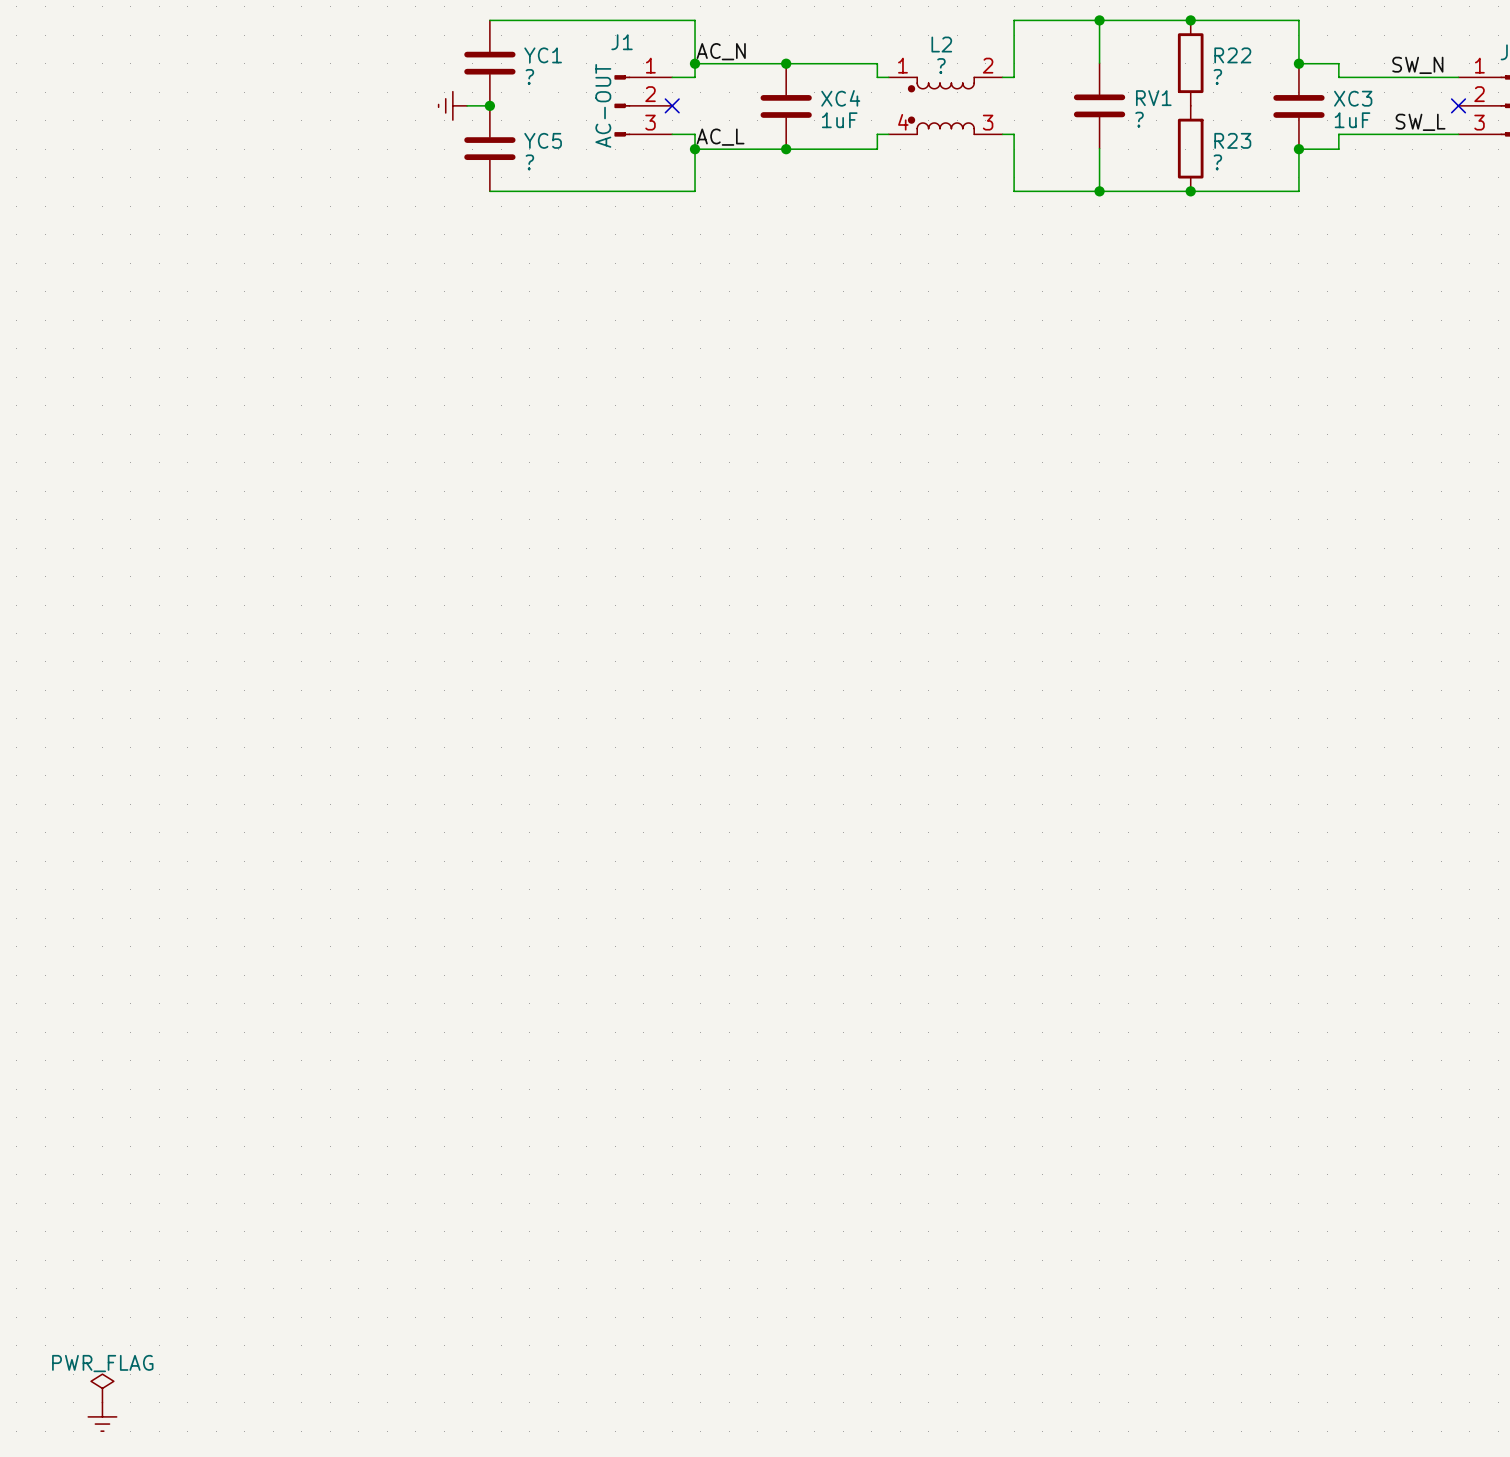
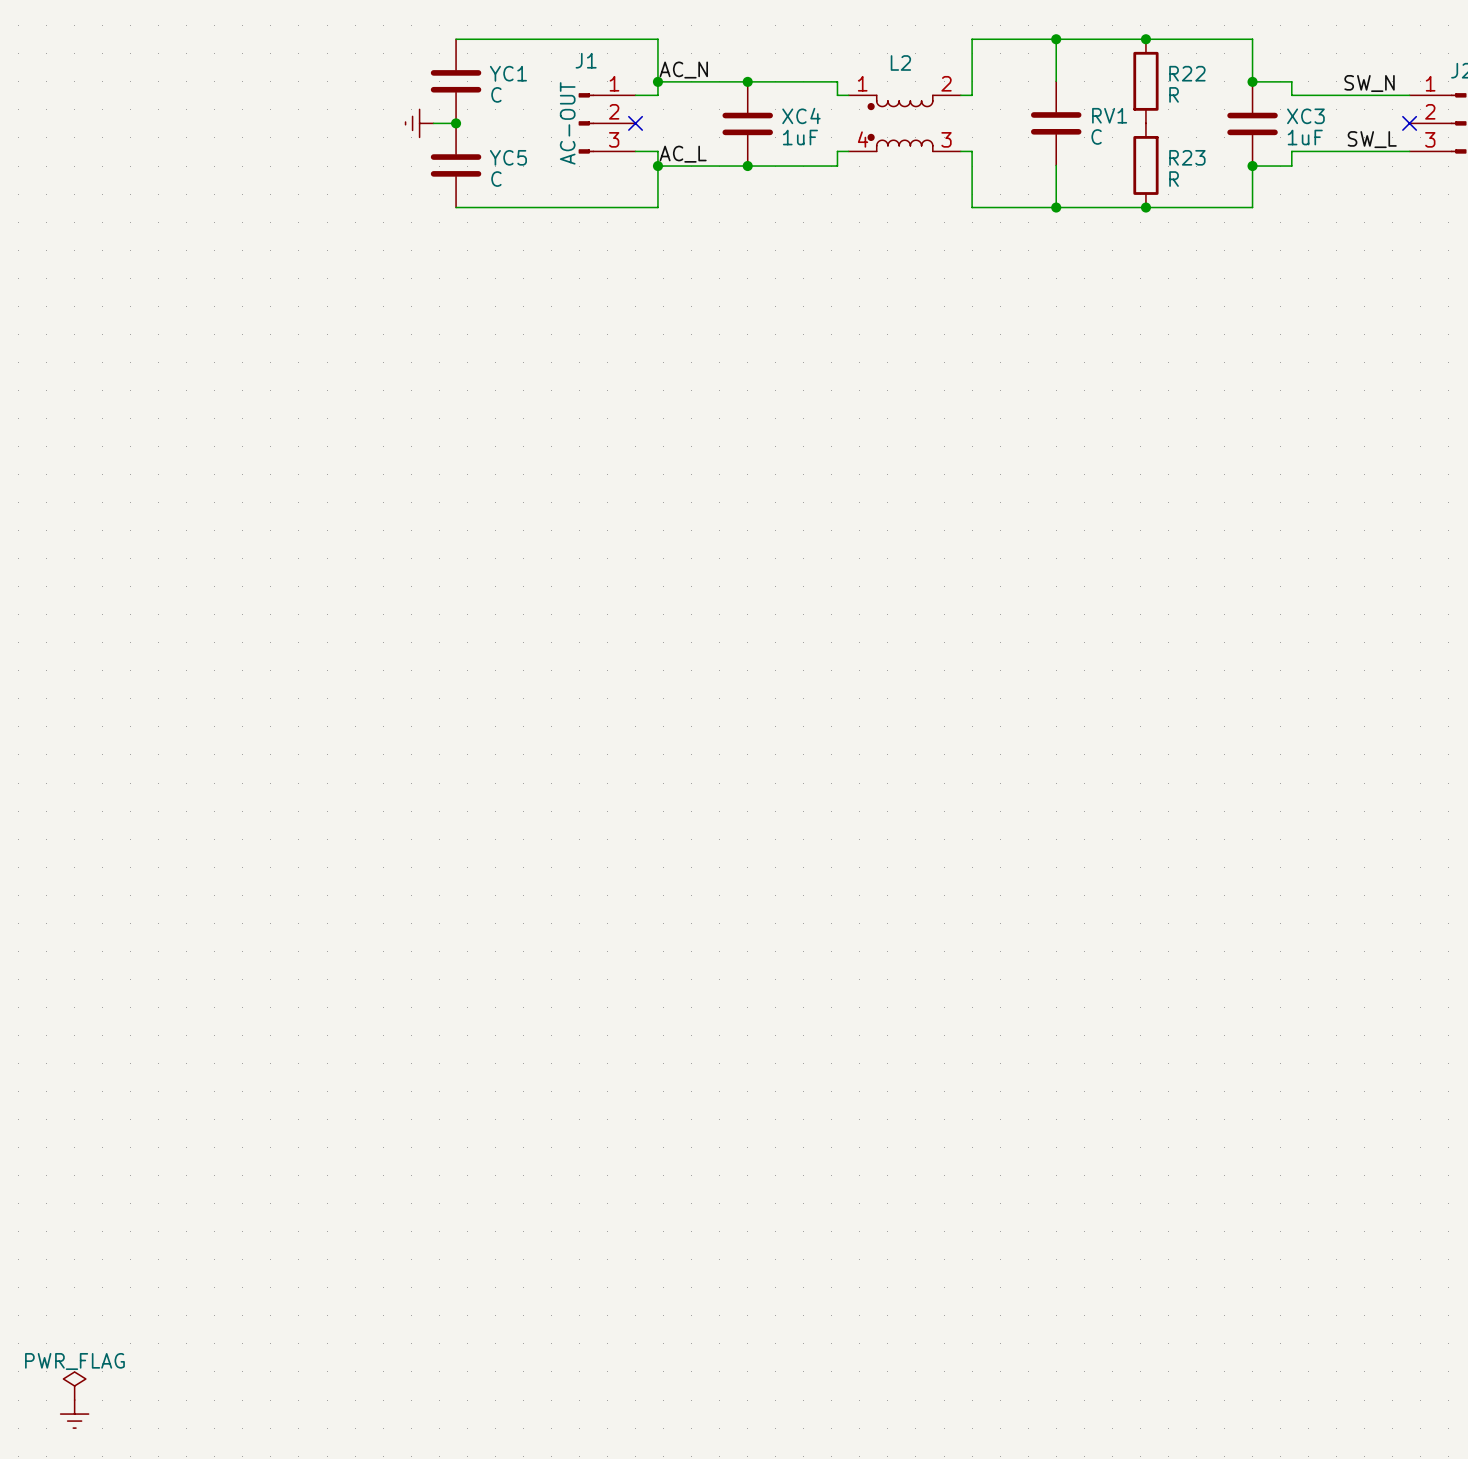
L2 value: ? (941, 66) -> none
YC1 value: ? (529, 76) -> C (496, 94)
R22 value: ? (1217, 76) -> R (1174, 94)
RV1 value: ? (1139, 119) -> C (1096, 136)
YC5 value: ? (529, 162) -> C (496, 179)
R23 value: ? (1217, 162) -> R (1174, 179)

